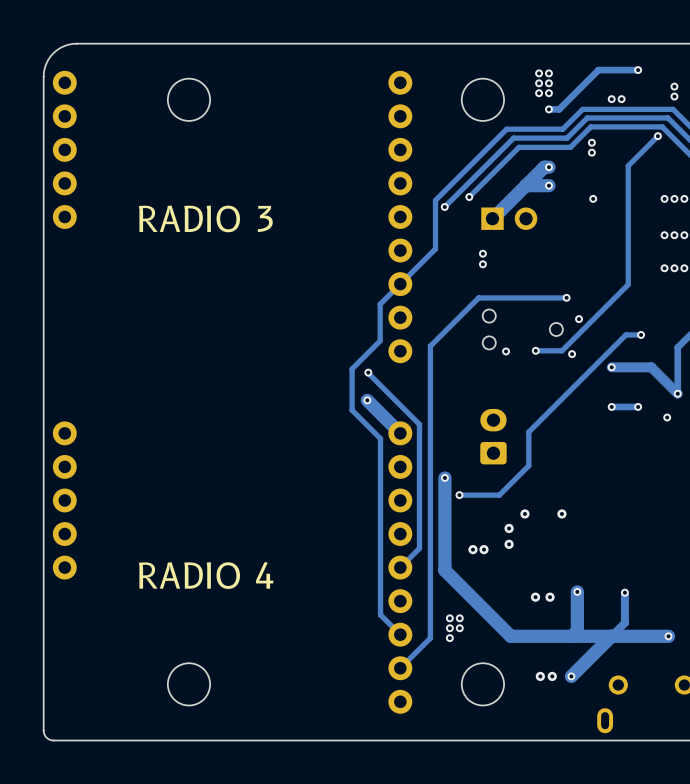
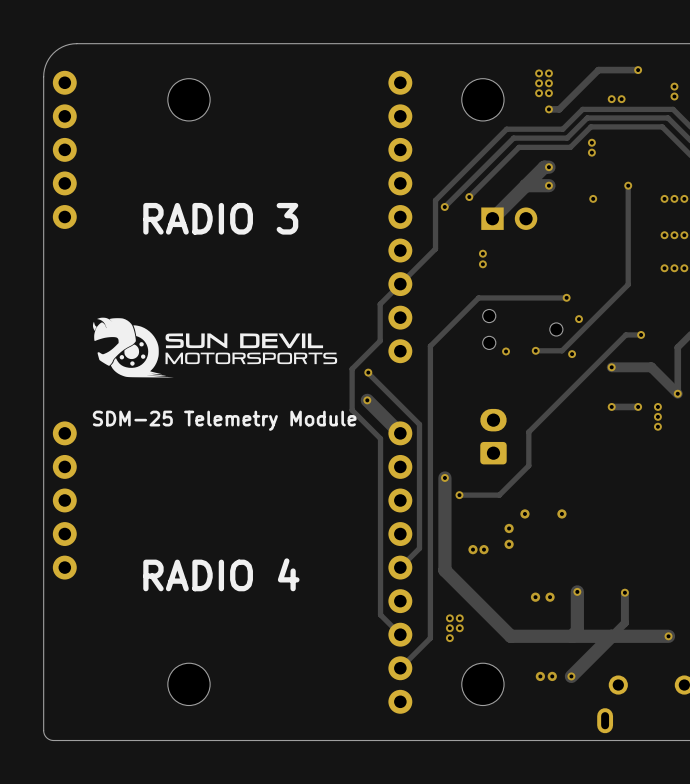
track: (657, 136) (628, 165) (628, 185) -> none
via position: (657, 136) -> (628, 185)
drawing: none -> [92, 317, 338, 378]
via: none -> (657, 406)
via: none -> (657, 416)
via: (667, 417) -> none
text: none -> SDM-25 Telemetry Module (224, 420)
via: none -> (657, 426)

